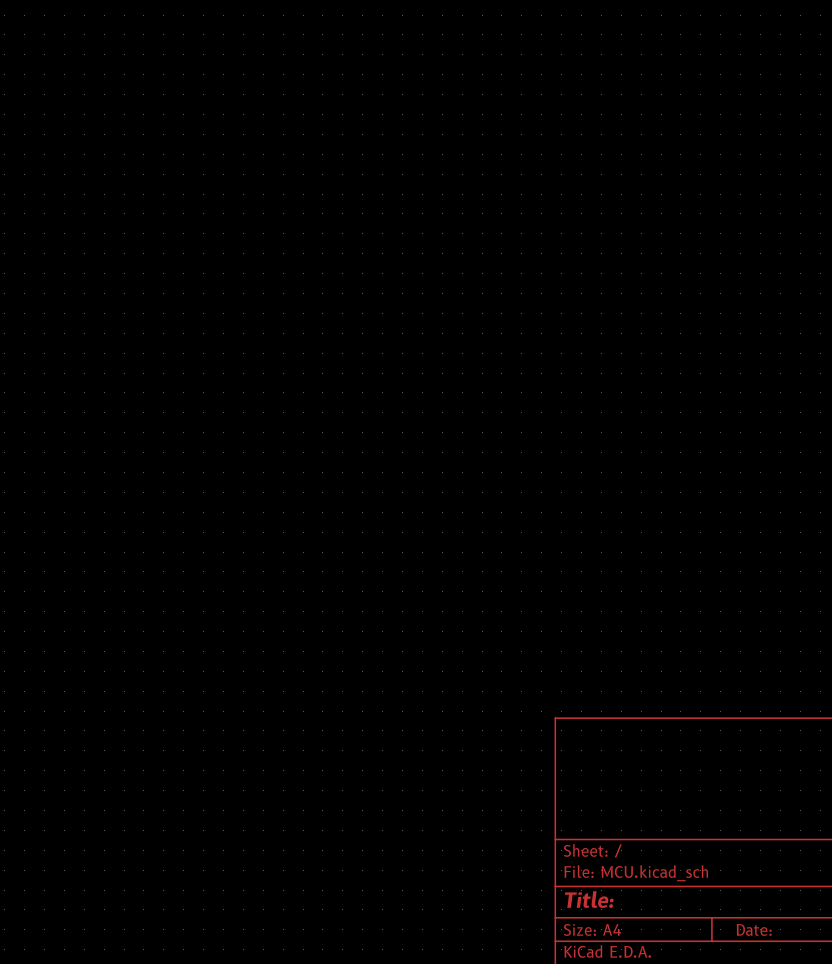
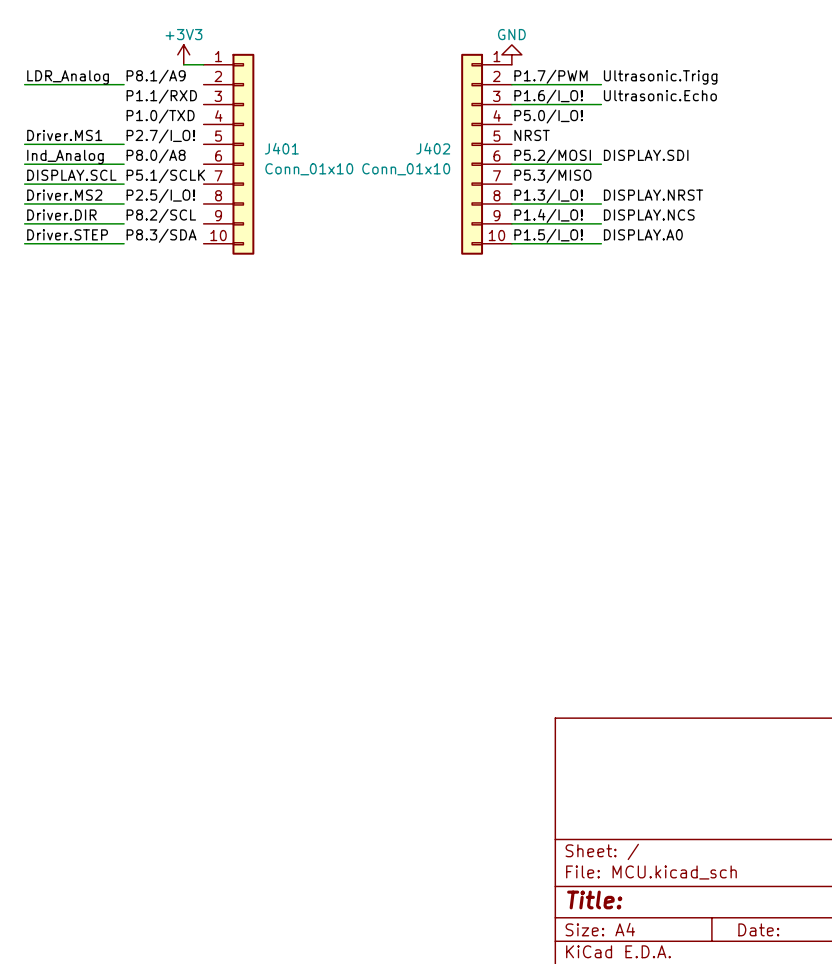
power symbol: none -> +3V3 (183, 54)
power symbol: none -> GND (511, 54)
wire: none -> (183, 64) (203, 64)
label: none -> P8.1/A9 (156, 76)
label: none -> P1.7/PWM (551, 76)
label: none -> LDR_Analog (68, 77)
label: none -> Ultrasonic.Trigg (660, 77)
wire: none -> (24, 84) (124, 84)
wire: none -> (511, 84) (601, 84)
label: none -> P1.1/RXD (161, 96)
label: none -> Ultrasonic.Echo (660, 95)
label: none -> P1.6/I_O! (548, 96)
wire: none -> (511, 104) (601, 104)
label: none -> P1.0/TXD (160, 116)
label: none -> P5.0/I_O! (548, 116)
label: none -> Driver.MS1 (64, 135)
label: none -> NRST (532, 135)
label: none -> P2.7/I_O! (160, 136)
wire: none -> (24, 144) (124, 144)
J401: none -> Conn_01x10 (228, 154)
J402: none -> Conn_01x10 (486, 154)
label: none -> P8.0/A8 (156, 156)
label: none -> P5.2/MOSI (552, 156)
label: none -> DISPLAY.SDI (646, 155)
label: none -> Ind_Analog (65, 156)
wire: none -> (24, 164) (124, 164)
wire: none -> (511, 164) (601, 164)
label: none -> DISPLAY.SCL (71, 175)
label: none -> P5.1/SCLK (165, 176)
label: none -> P5.3/MISO (552, 176)
wire: none -> (24, 184) (124, 184)
label: none -> Driver.MS2 (64, 195)
label: none -> DISPLAY.NRST (653, 195)
label: none -> P2.5/I_O! (160, 196)
label: none -> P1.3/I_O! (548, 196)
wire: none -> (24, 203) (124, 203)
wire: none -> (511, 203) (601, 203)
label: none -> Driver.DIR (61, 214)
label: none -> P8.2/SCL (161, 215)
label: none -> DISPLAY.NCS (649, 214)
label: none -> P1.4/I_O! (548, 215)
wire: none -> (24, 223) (124, 223)
wire: none -> (511, 223) (601, 223)
label: none -> Driver.STEP (67, 234)
label: none -> P8.3/SDA (161, 235)
label: none -> DISPLAY.A0 (643, 234)
label: none -> P1.5/I_O! (548, 235)
wire: none -> (24, 243) (124, 243)
wire: none -> (511, 243) (601, 243)

